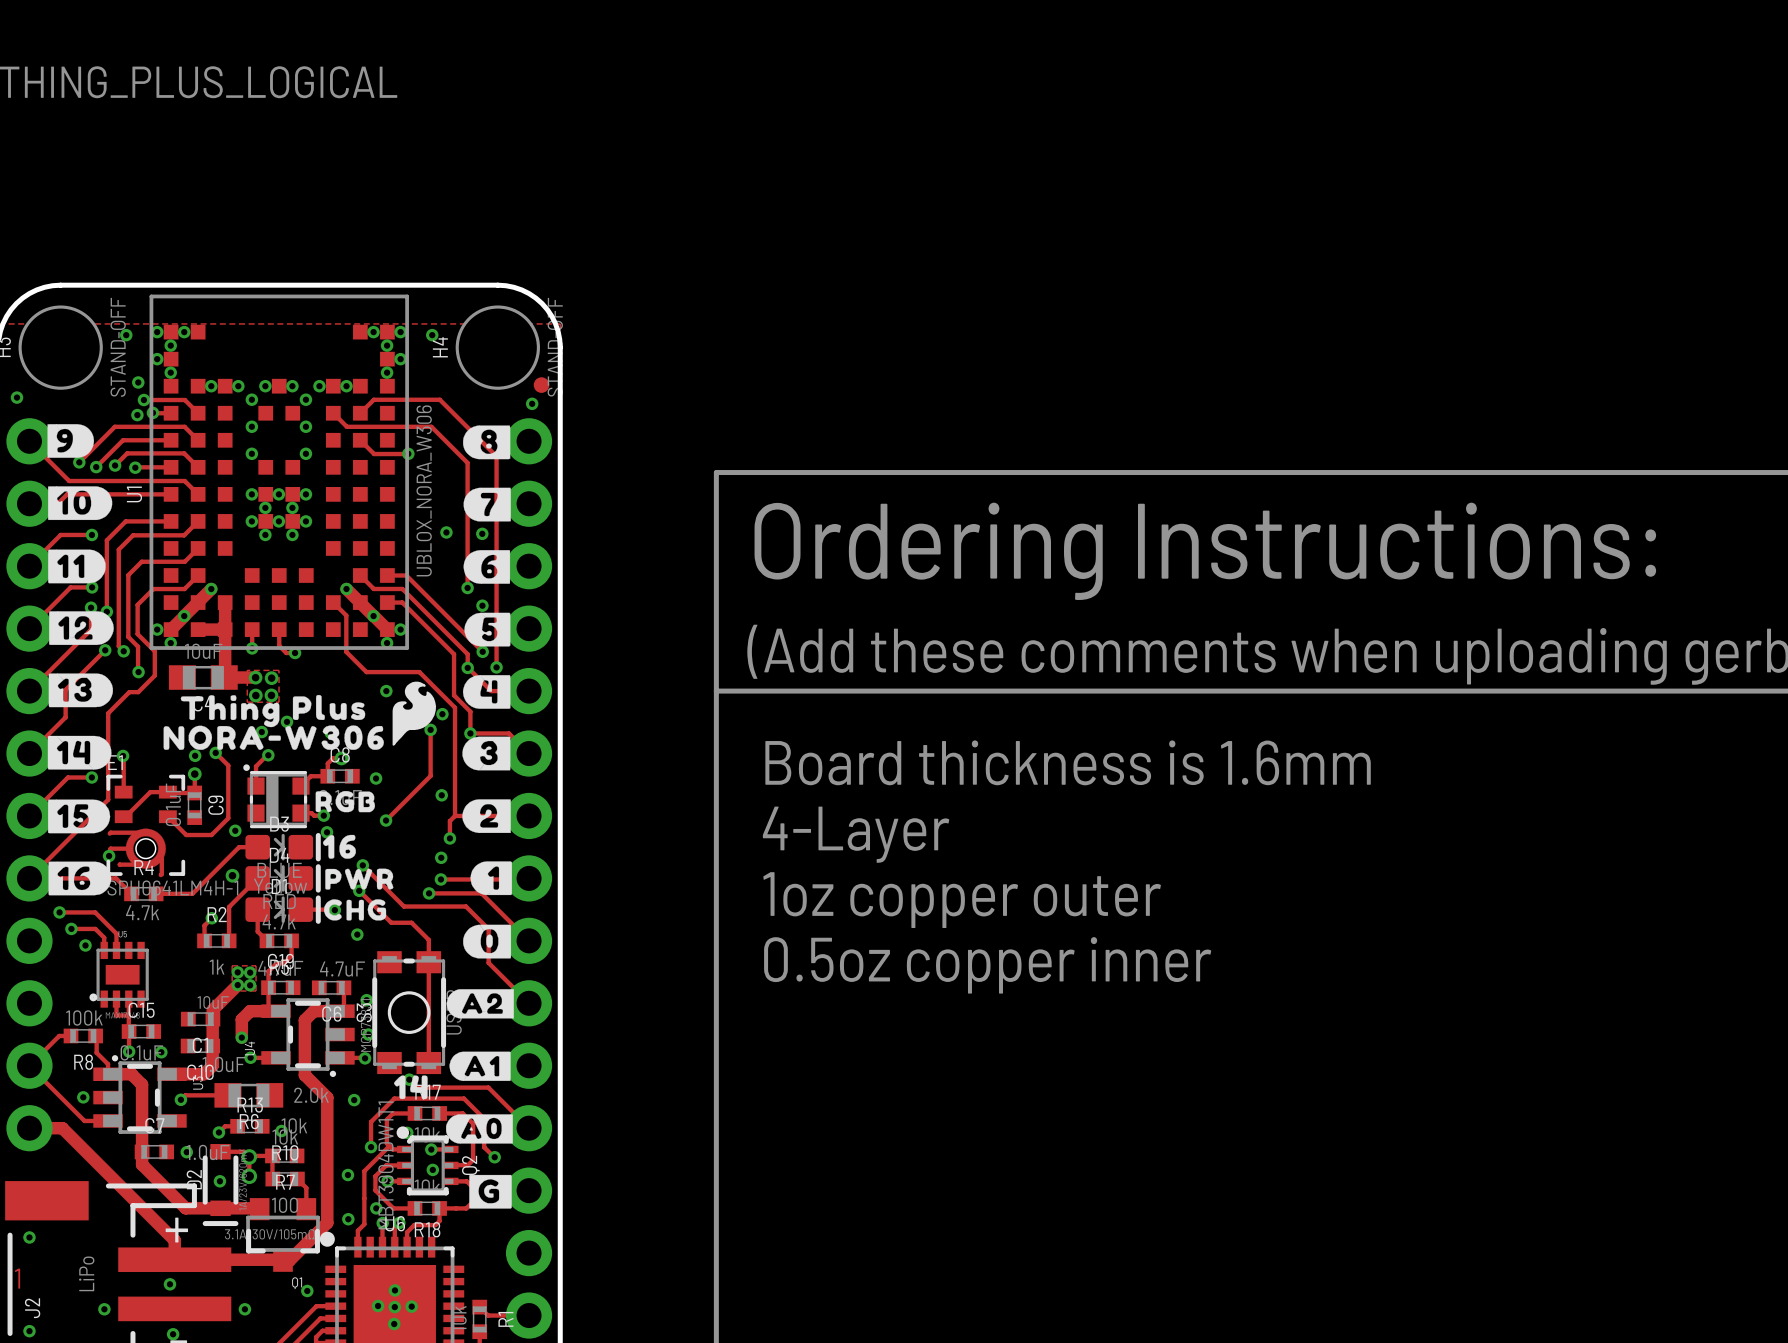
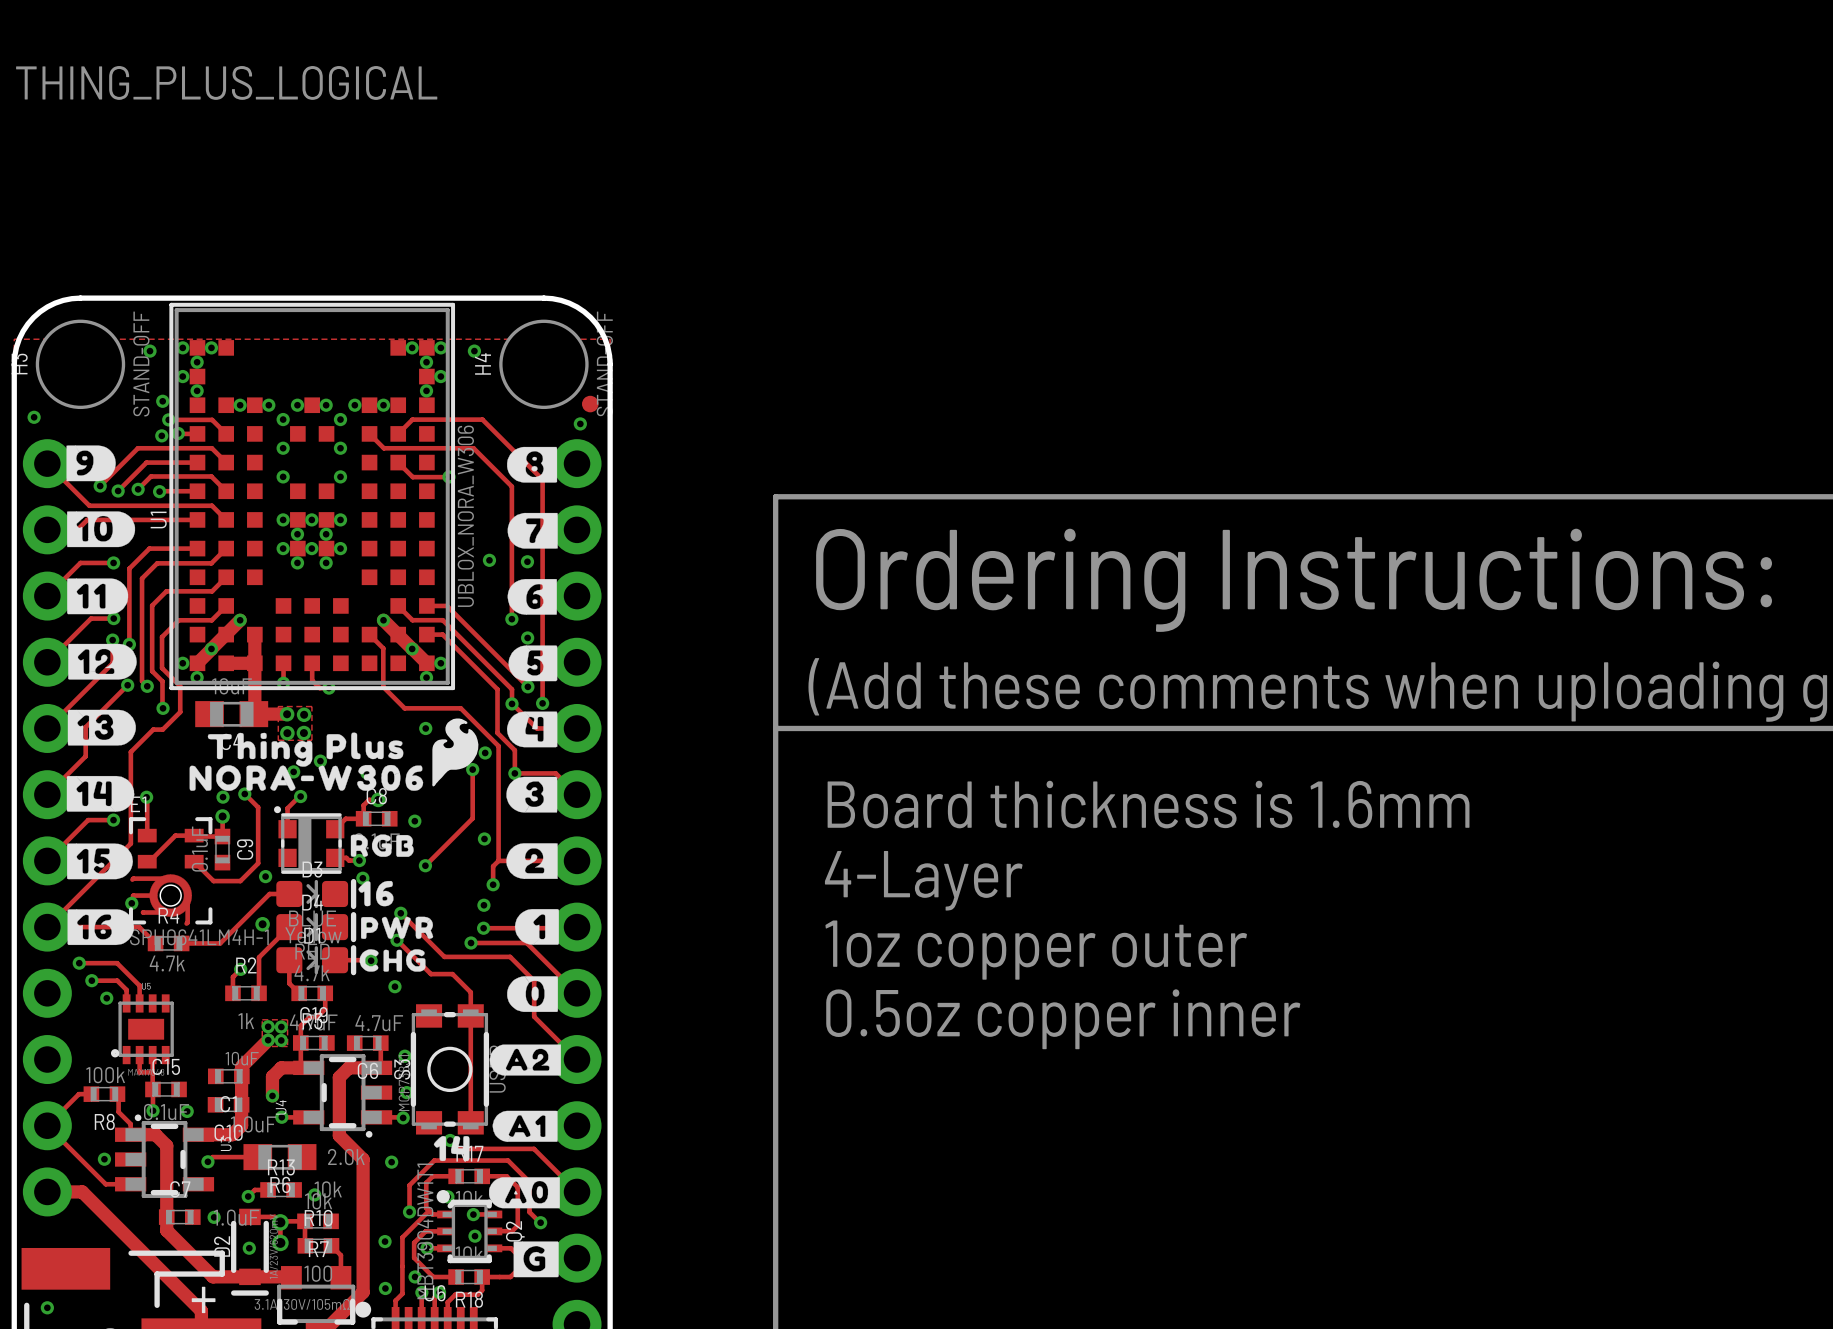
U1 footprint: [149, 294, 409, 650] -> [169, 302, 456, 691]

